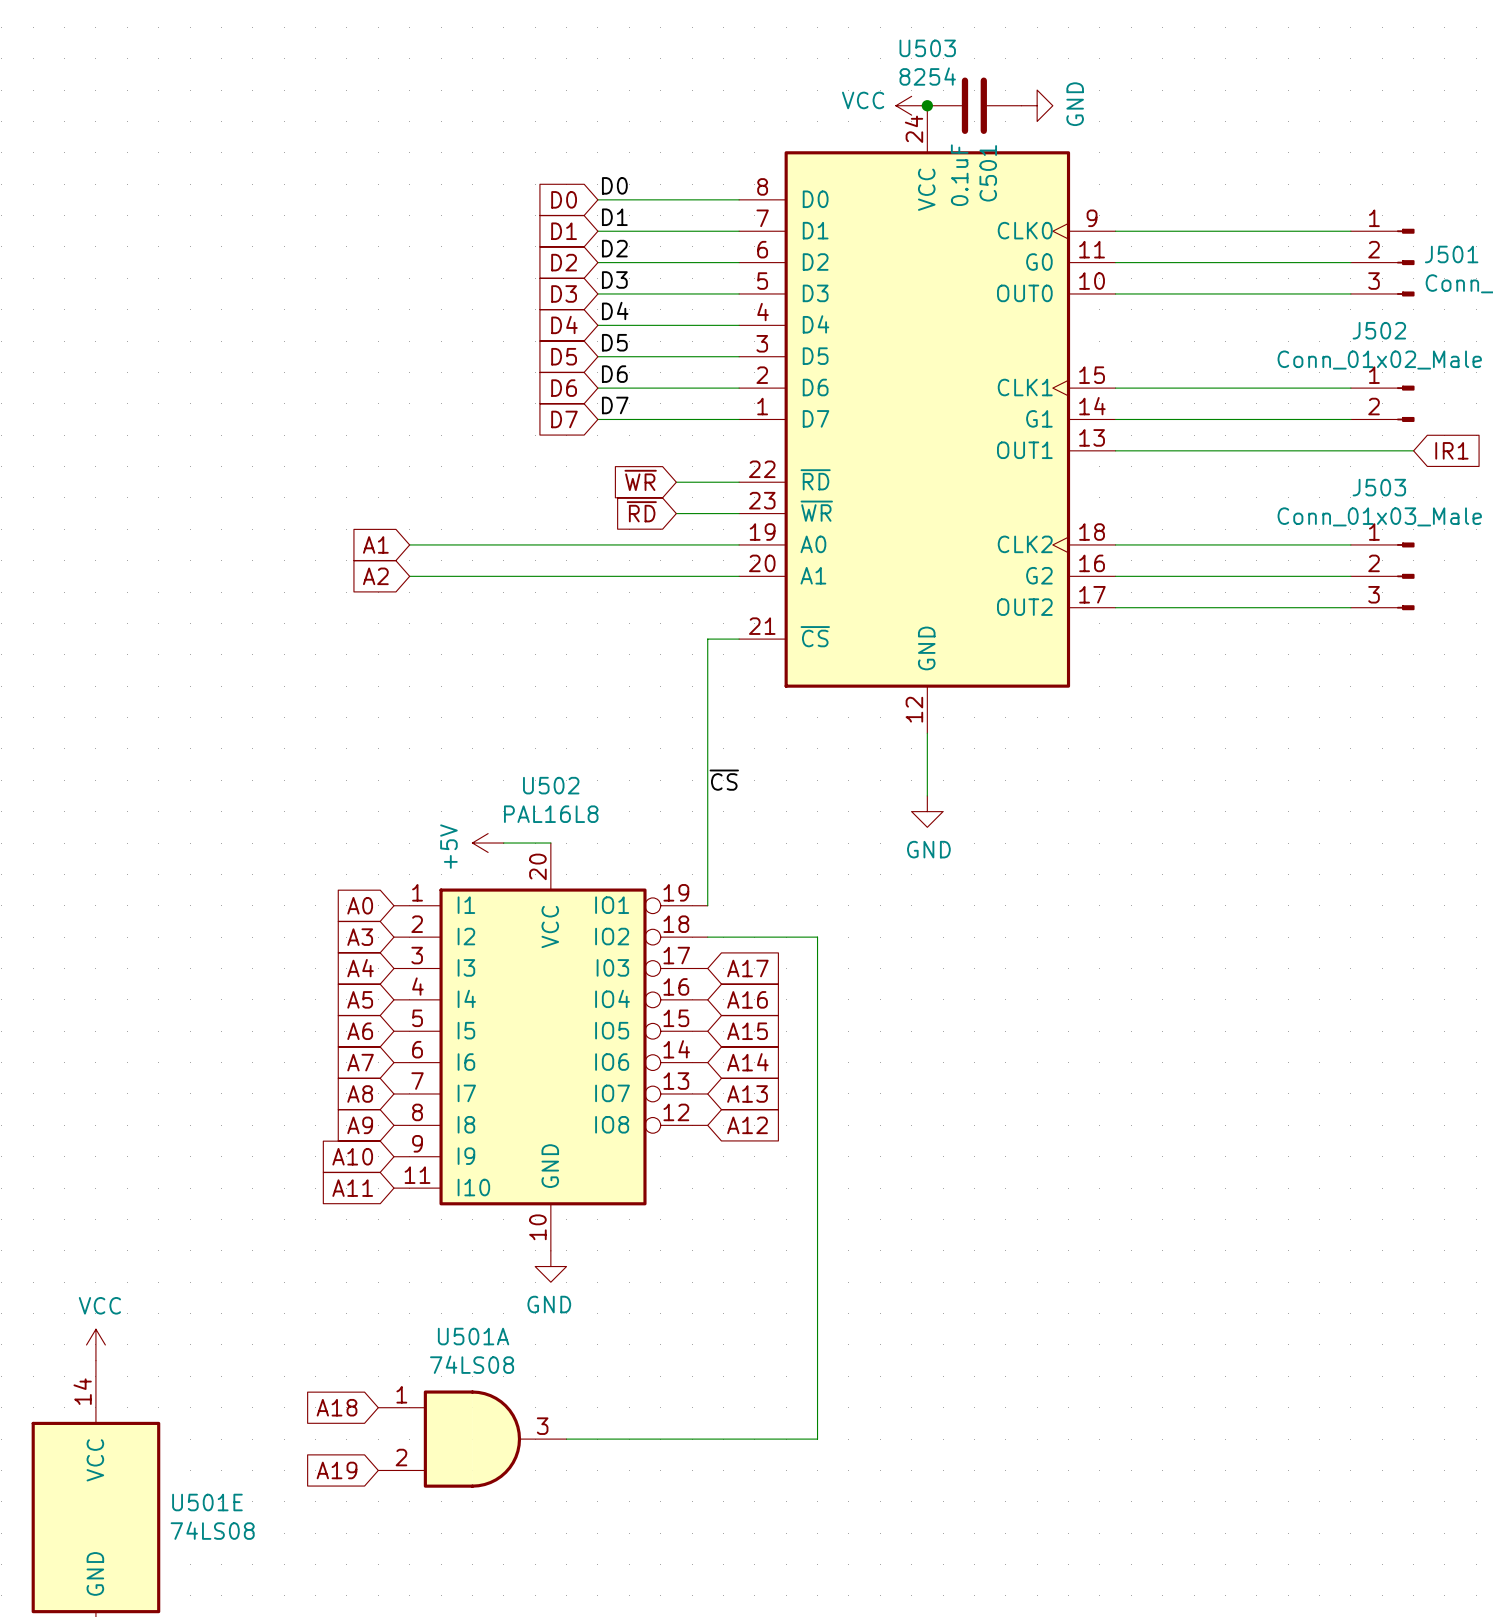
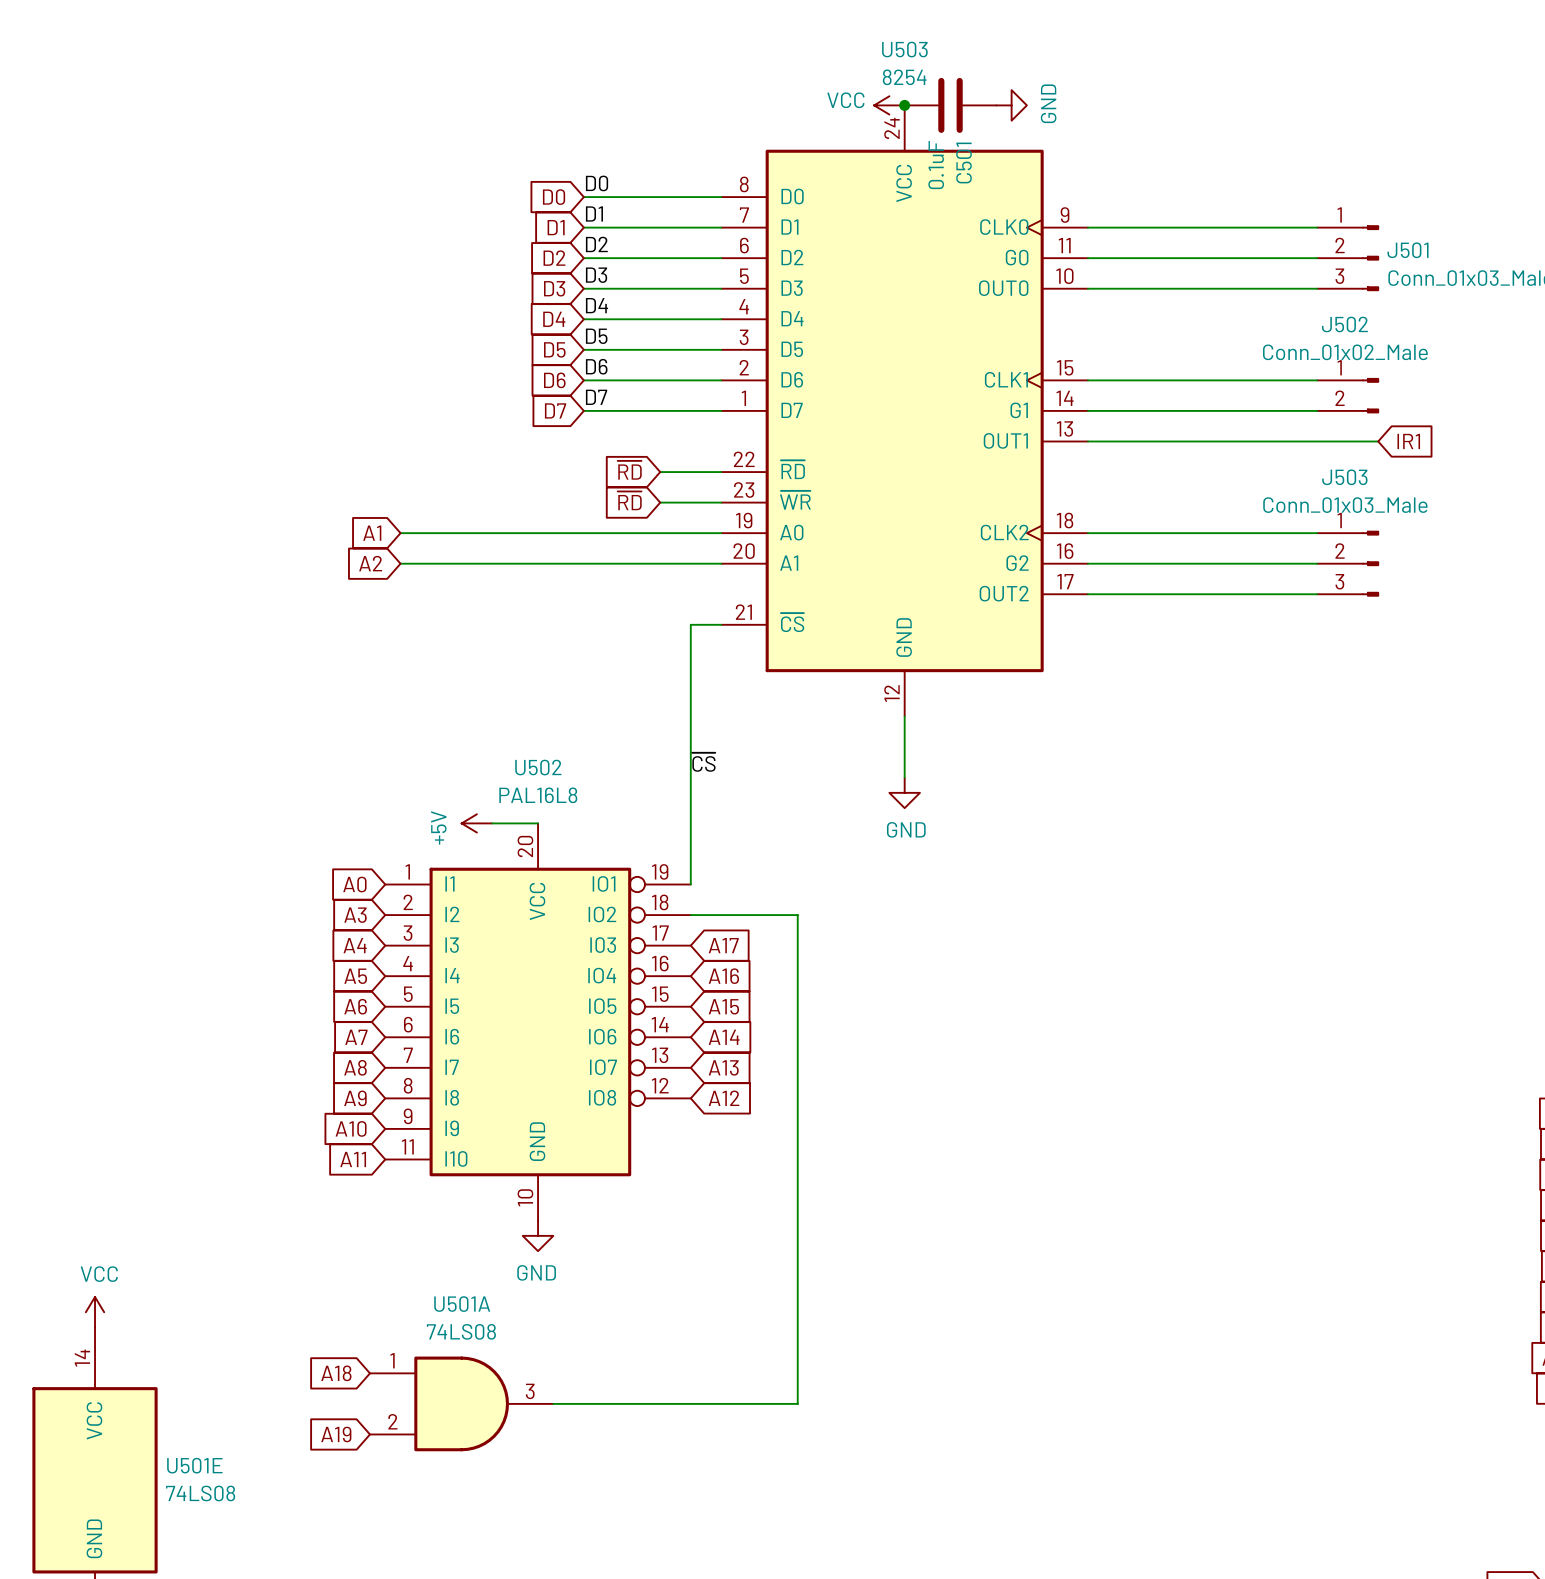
global label: ~{WR} (640, 480) -> ~{RD} (629, 470)

